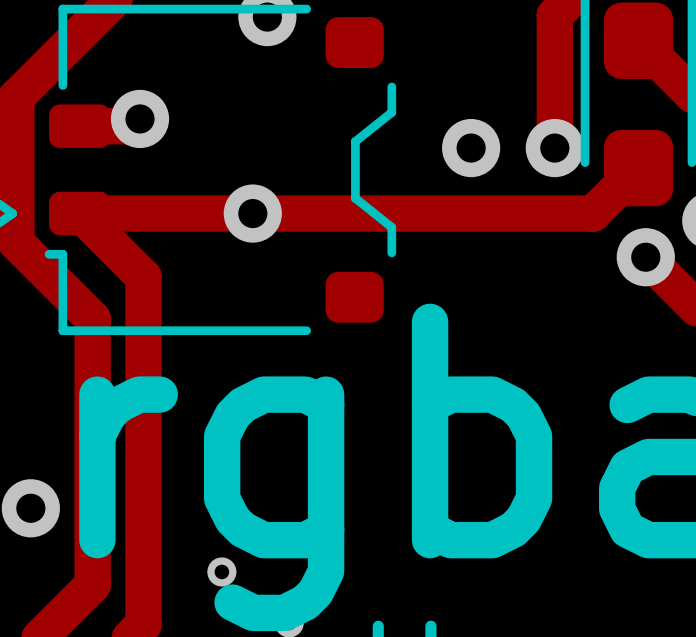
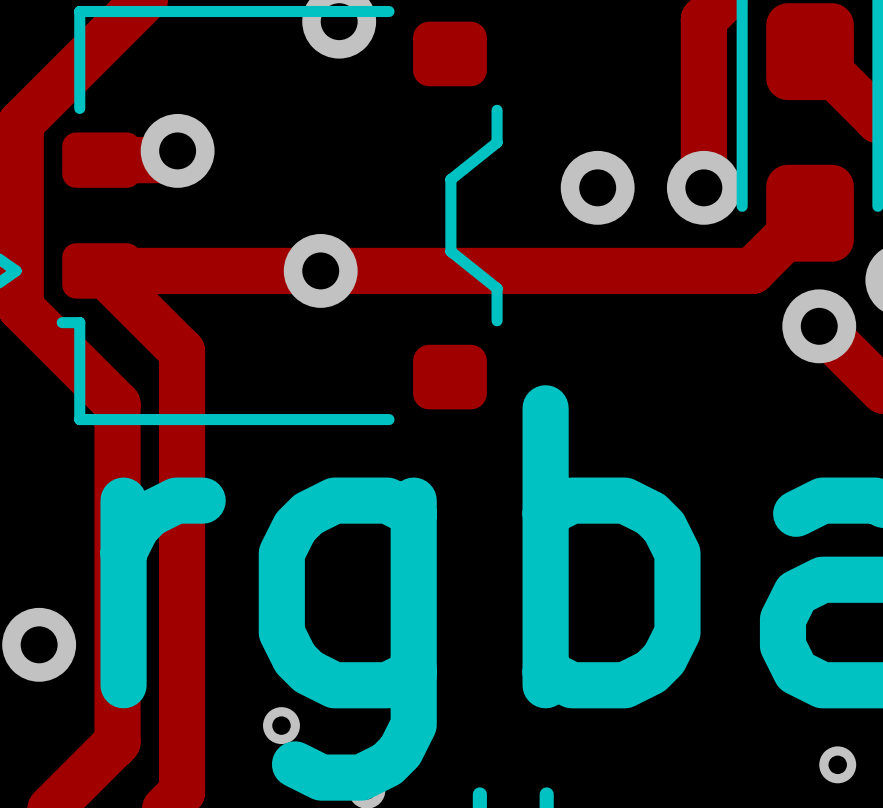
via: none -> (837, 764)

